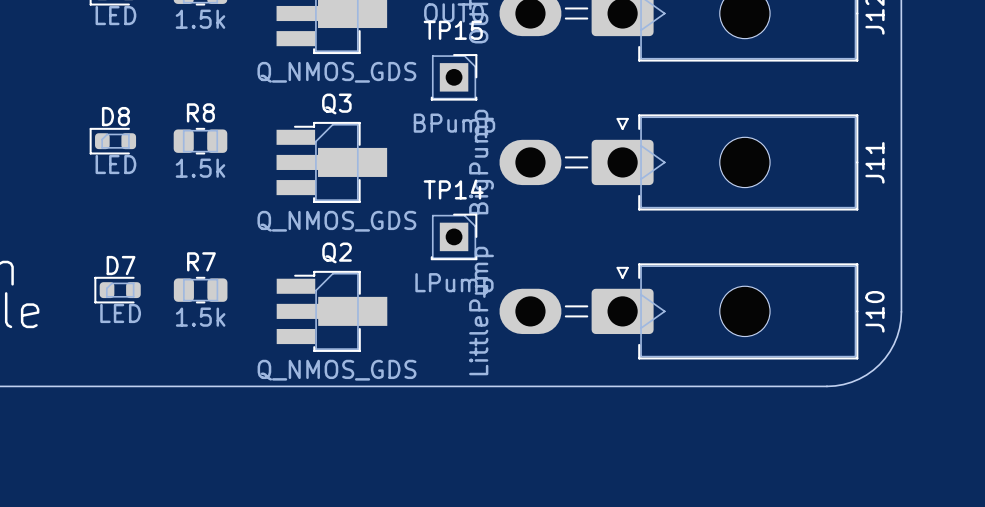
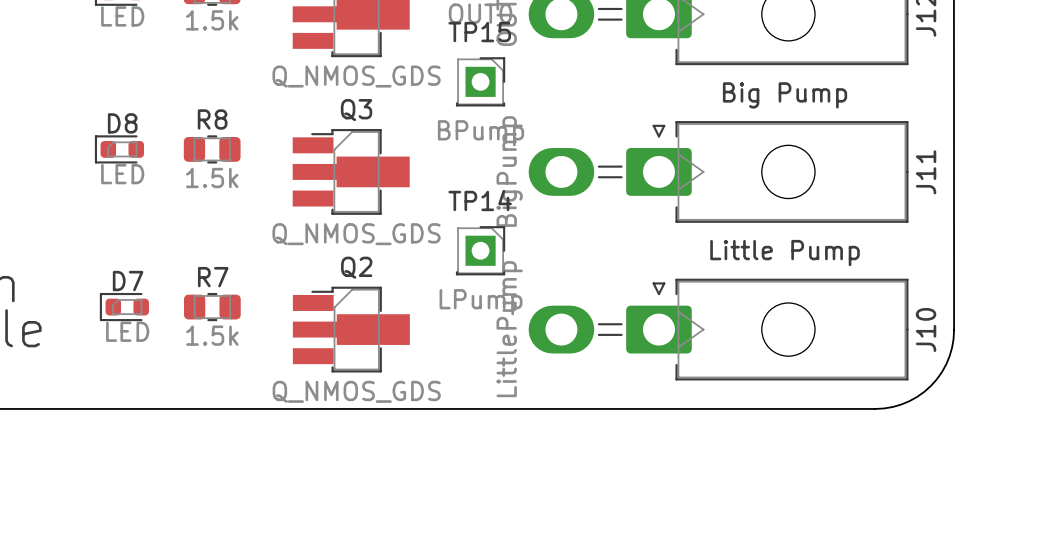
text: none -> Big Pump (785, 95)
text: none -> Little Pump (785, 253)

